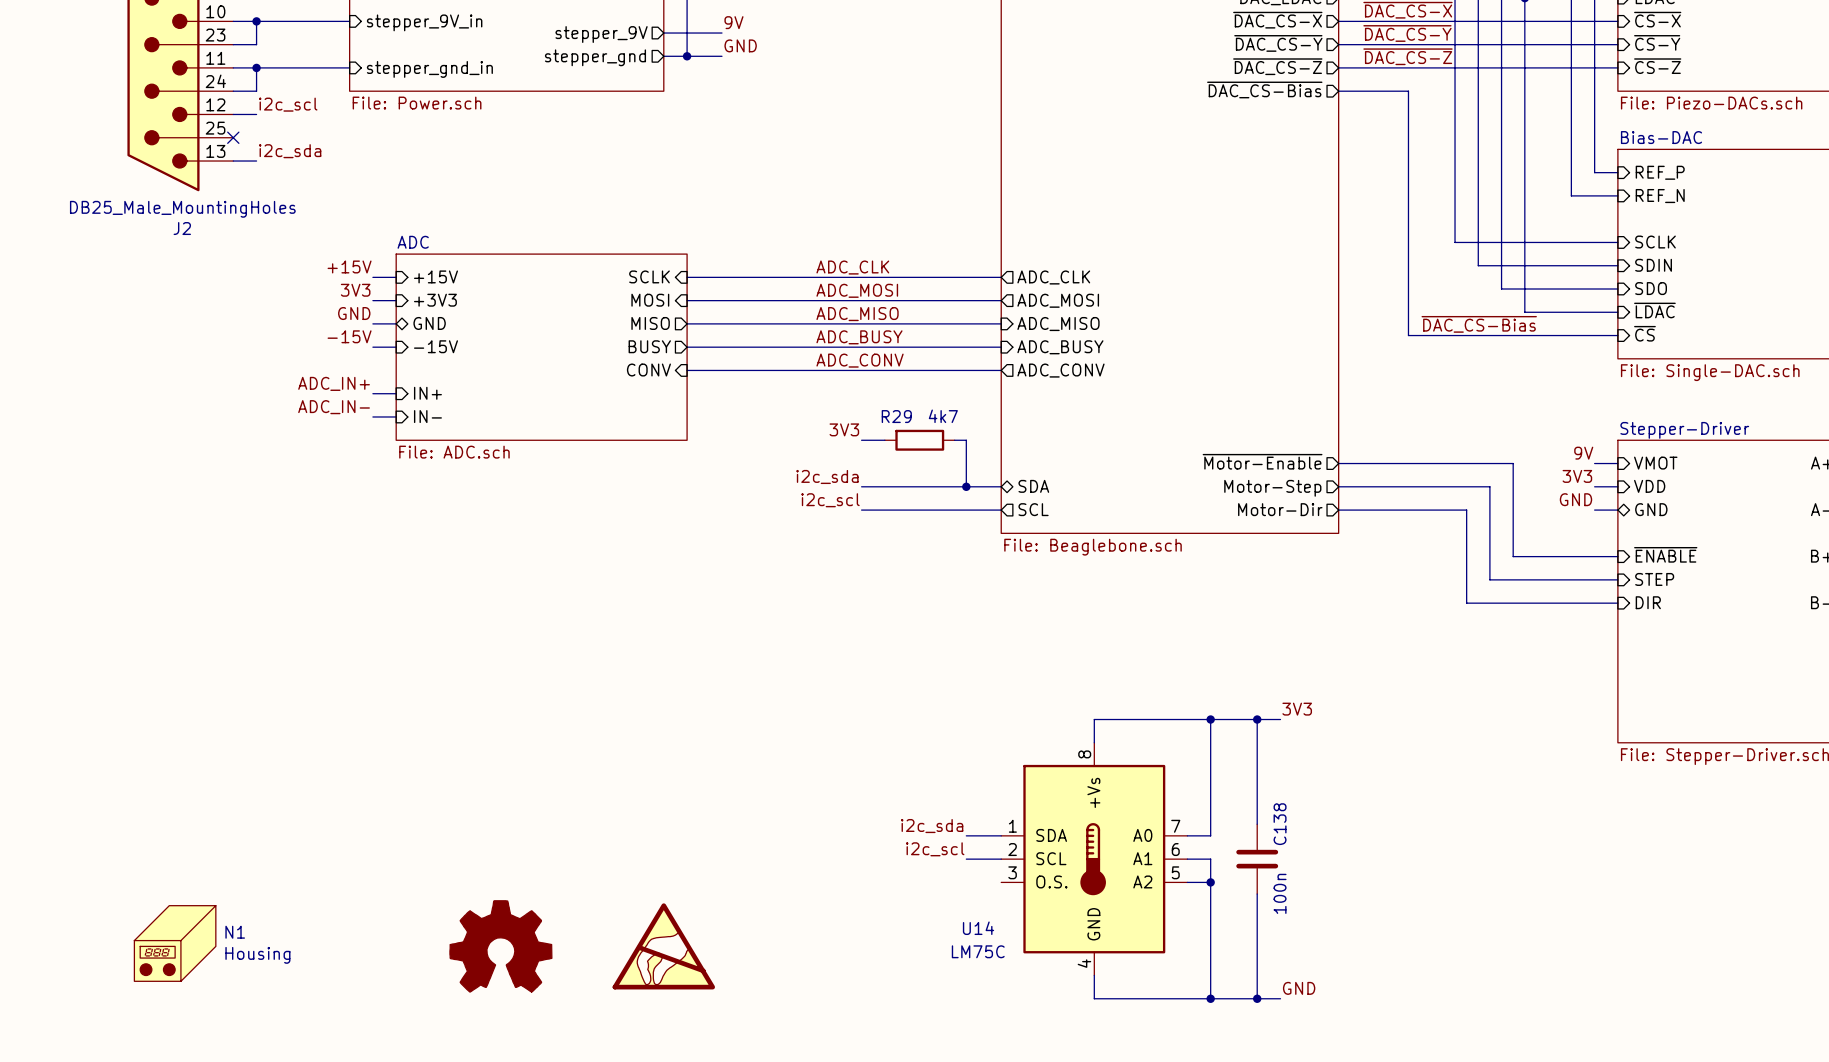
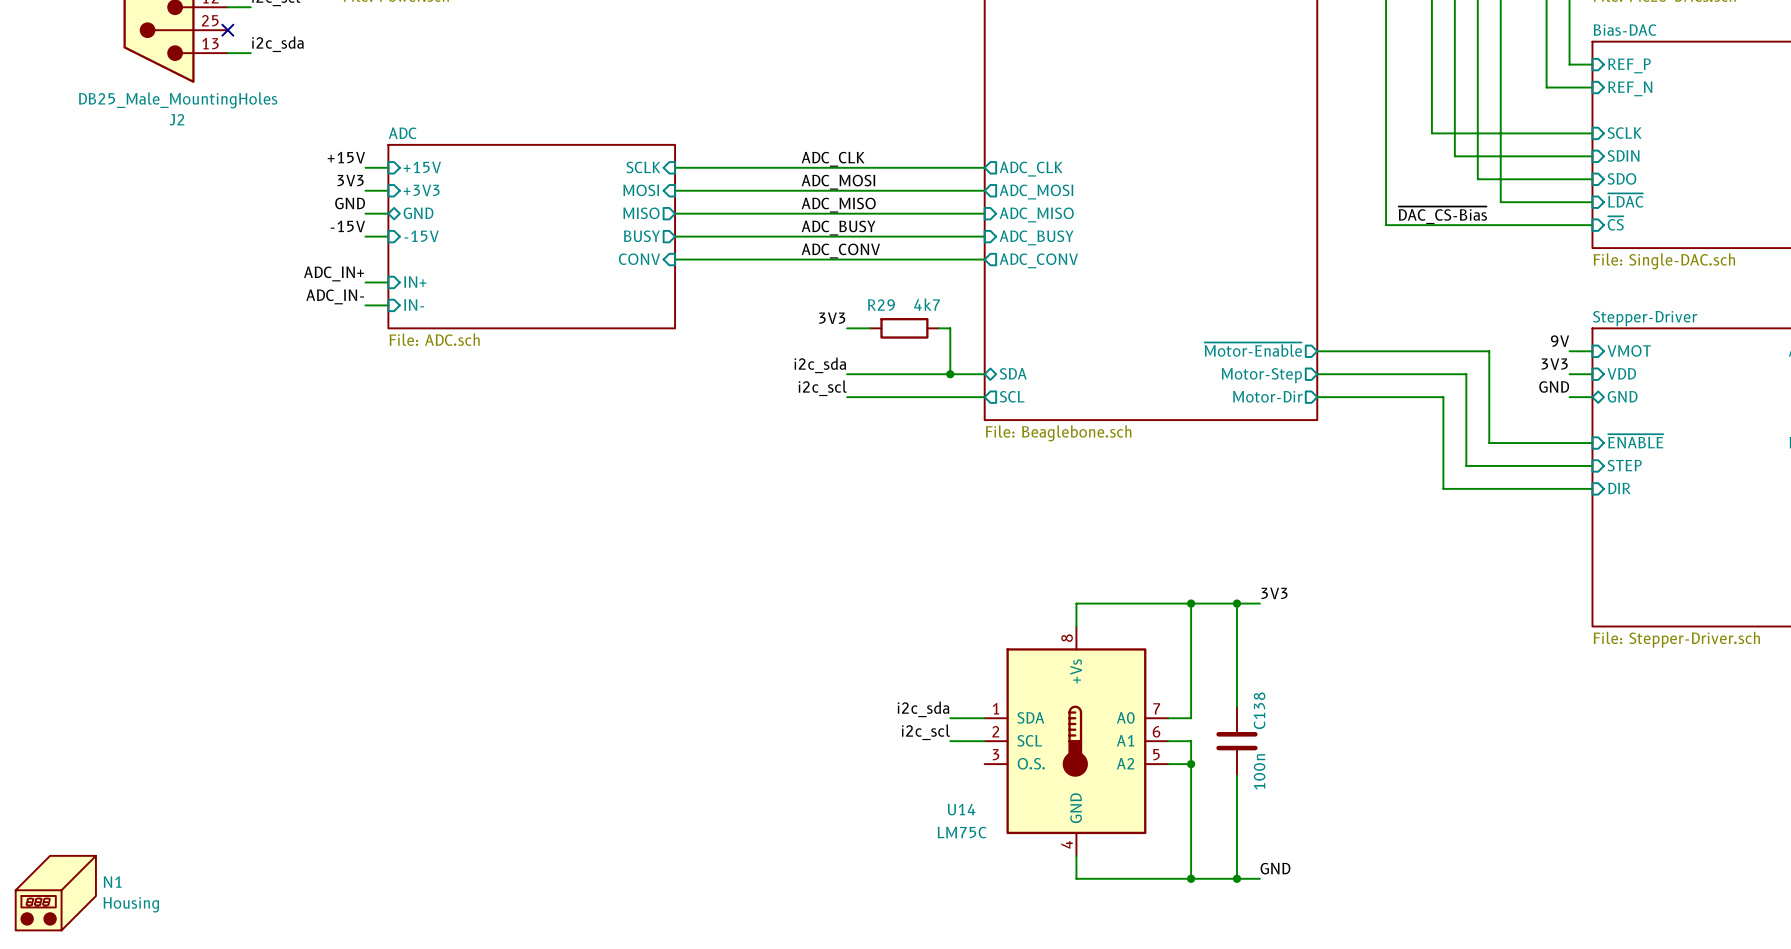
N1 position: (175, 943) -> (55, 893)
part: (500, 946) -> none
part: (663, 946) -> none

